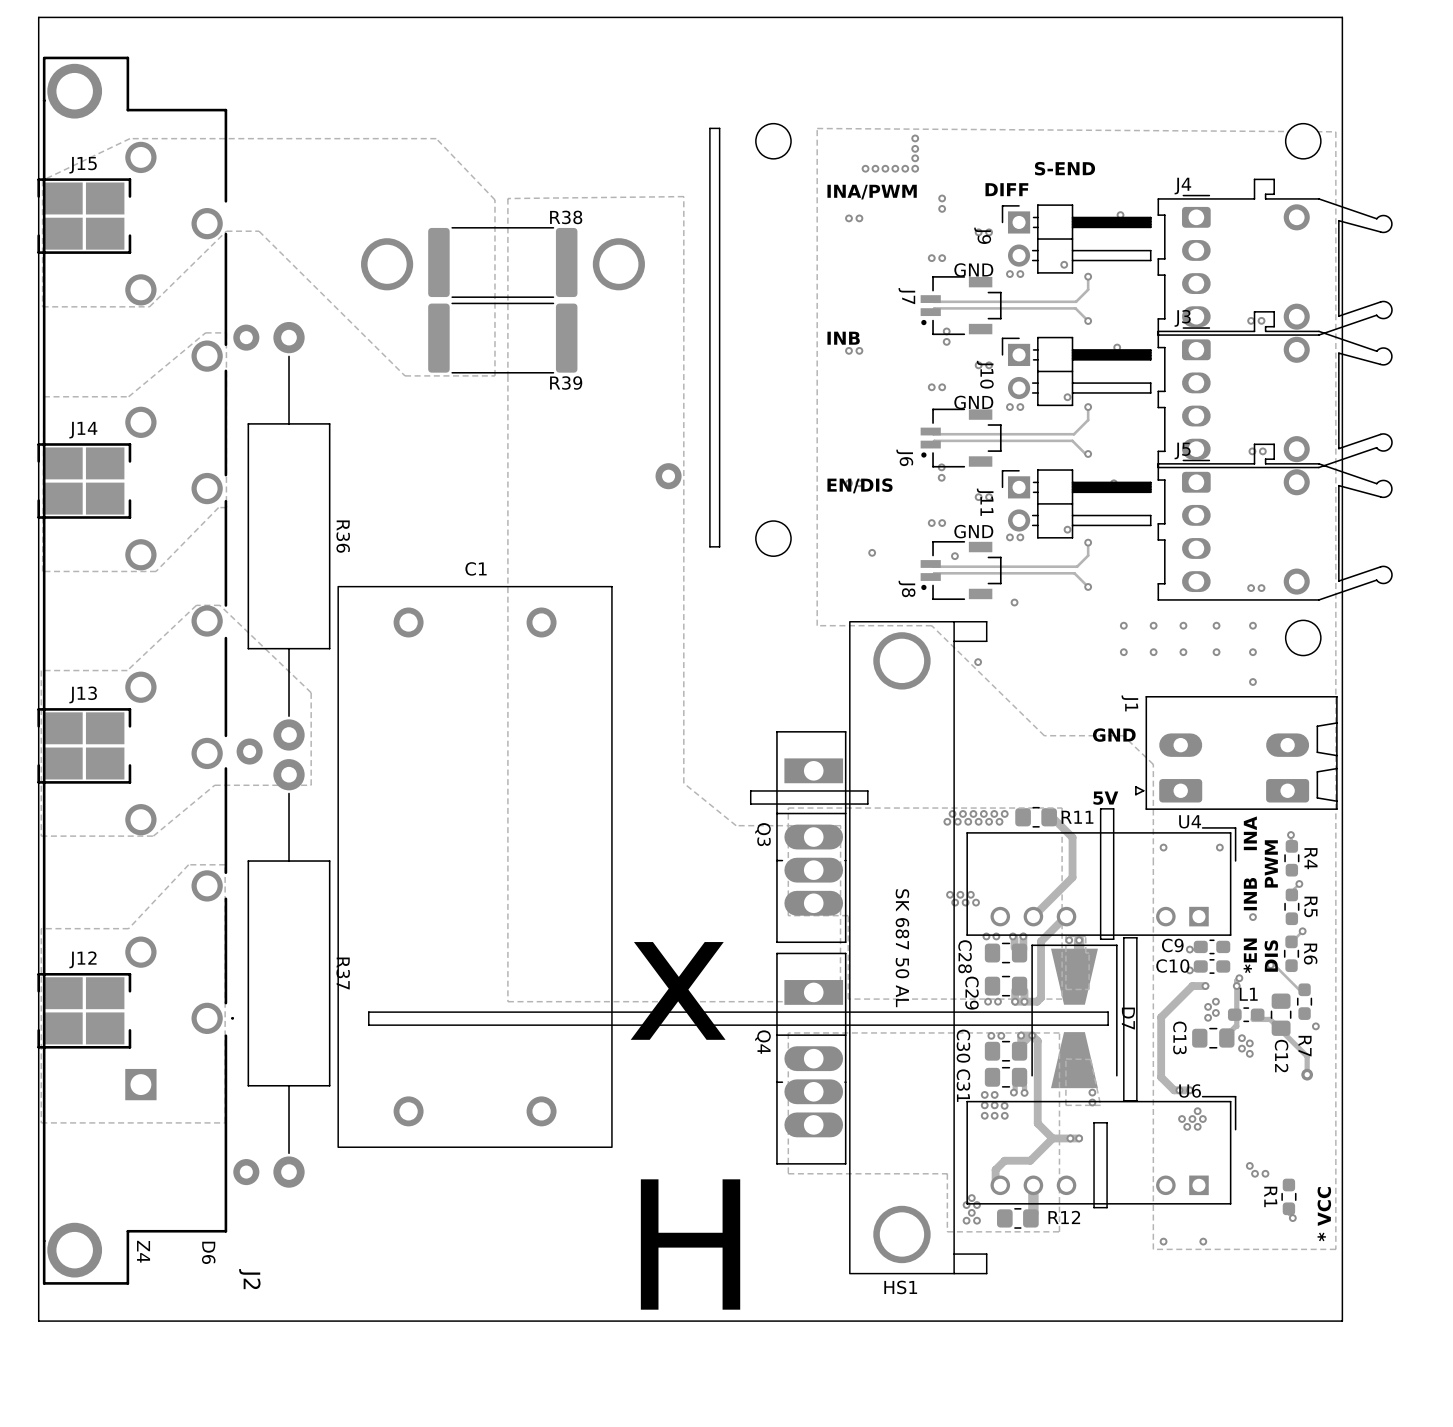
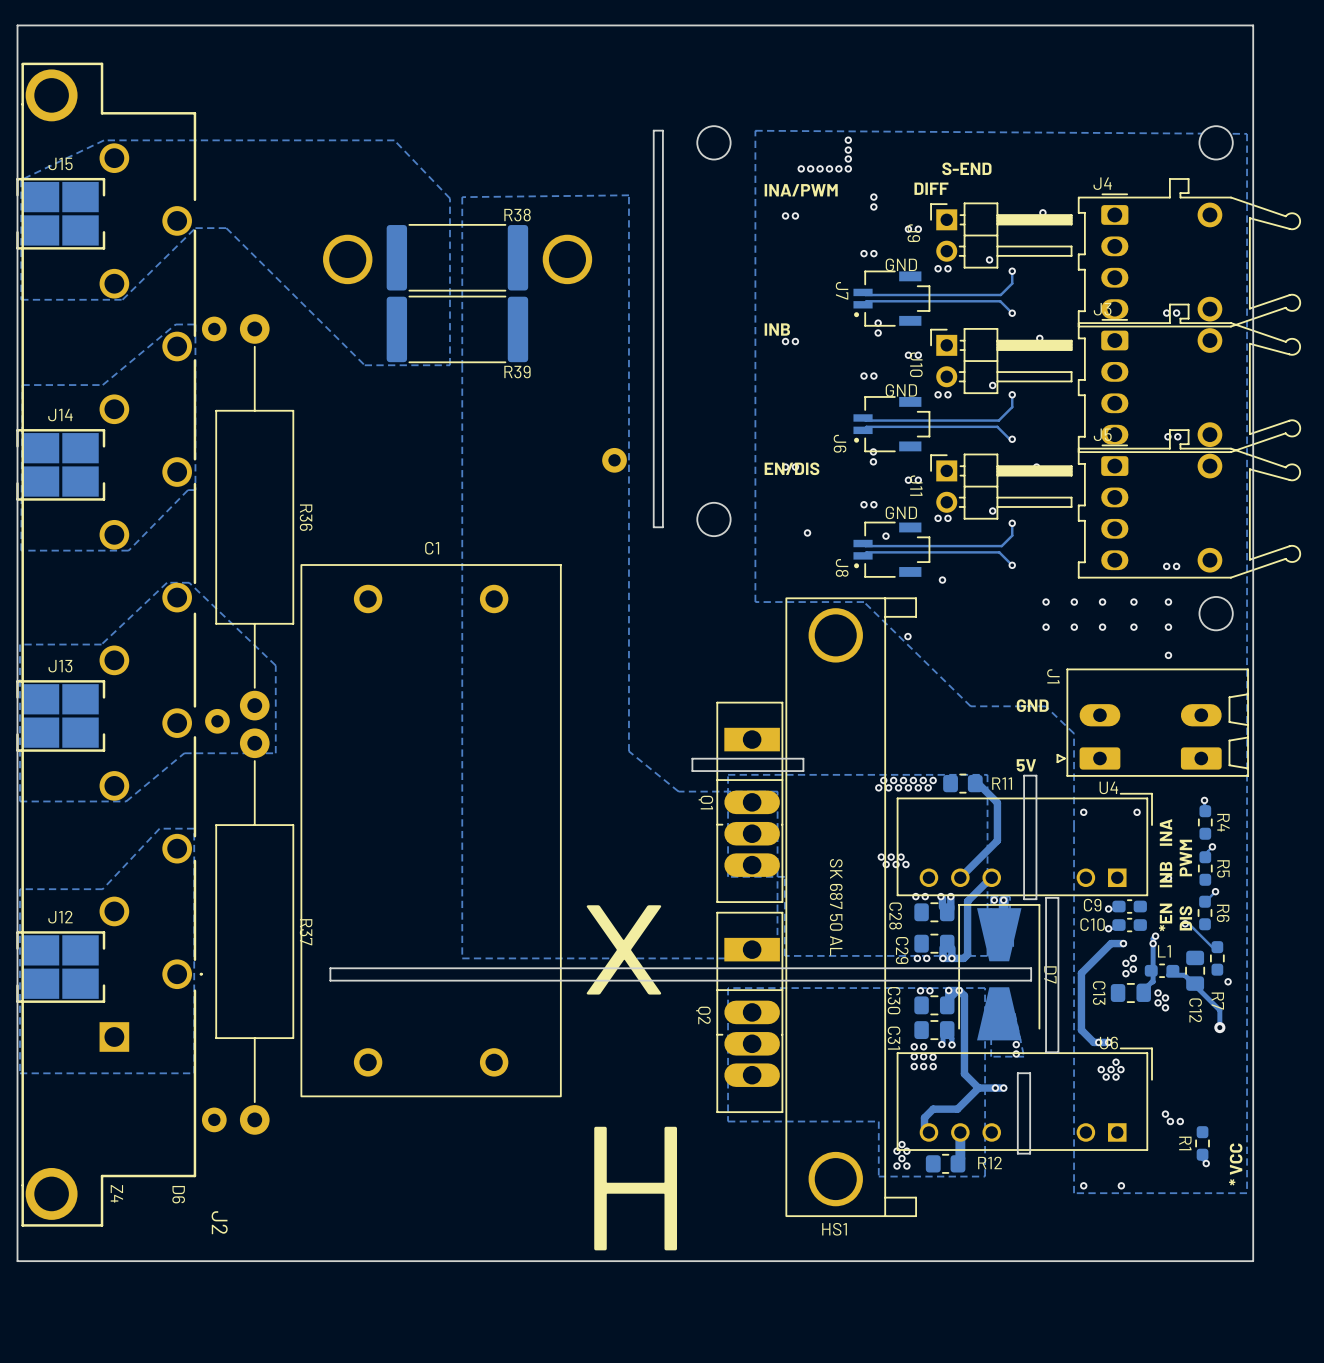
Q3 name: Q3 (762, 834) -> Q1 (705, 802)
Q4 name: Q4 (762, 1042) -> Q2 (703, 1015)

